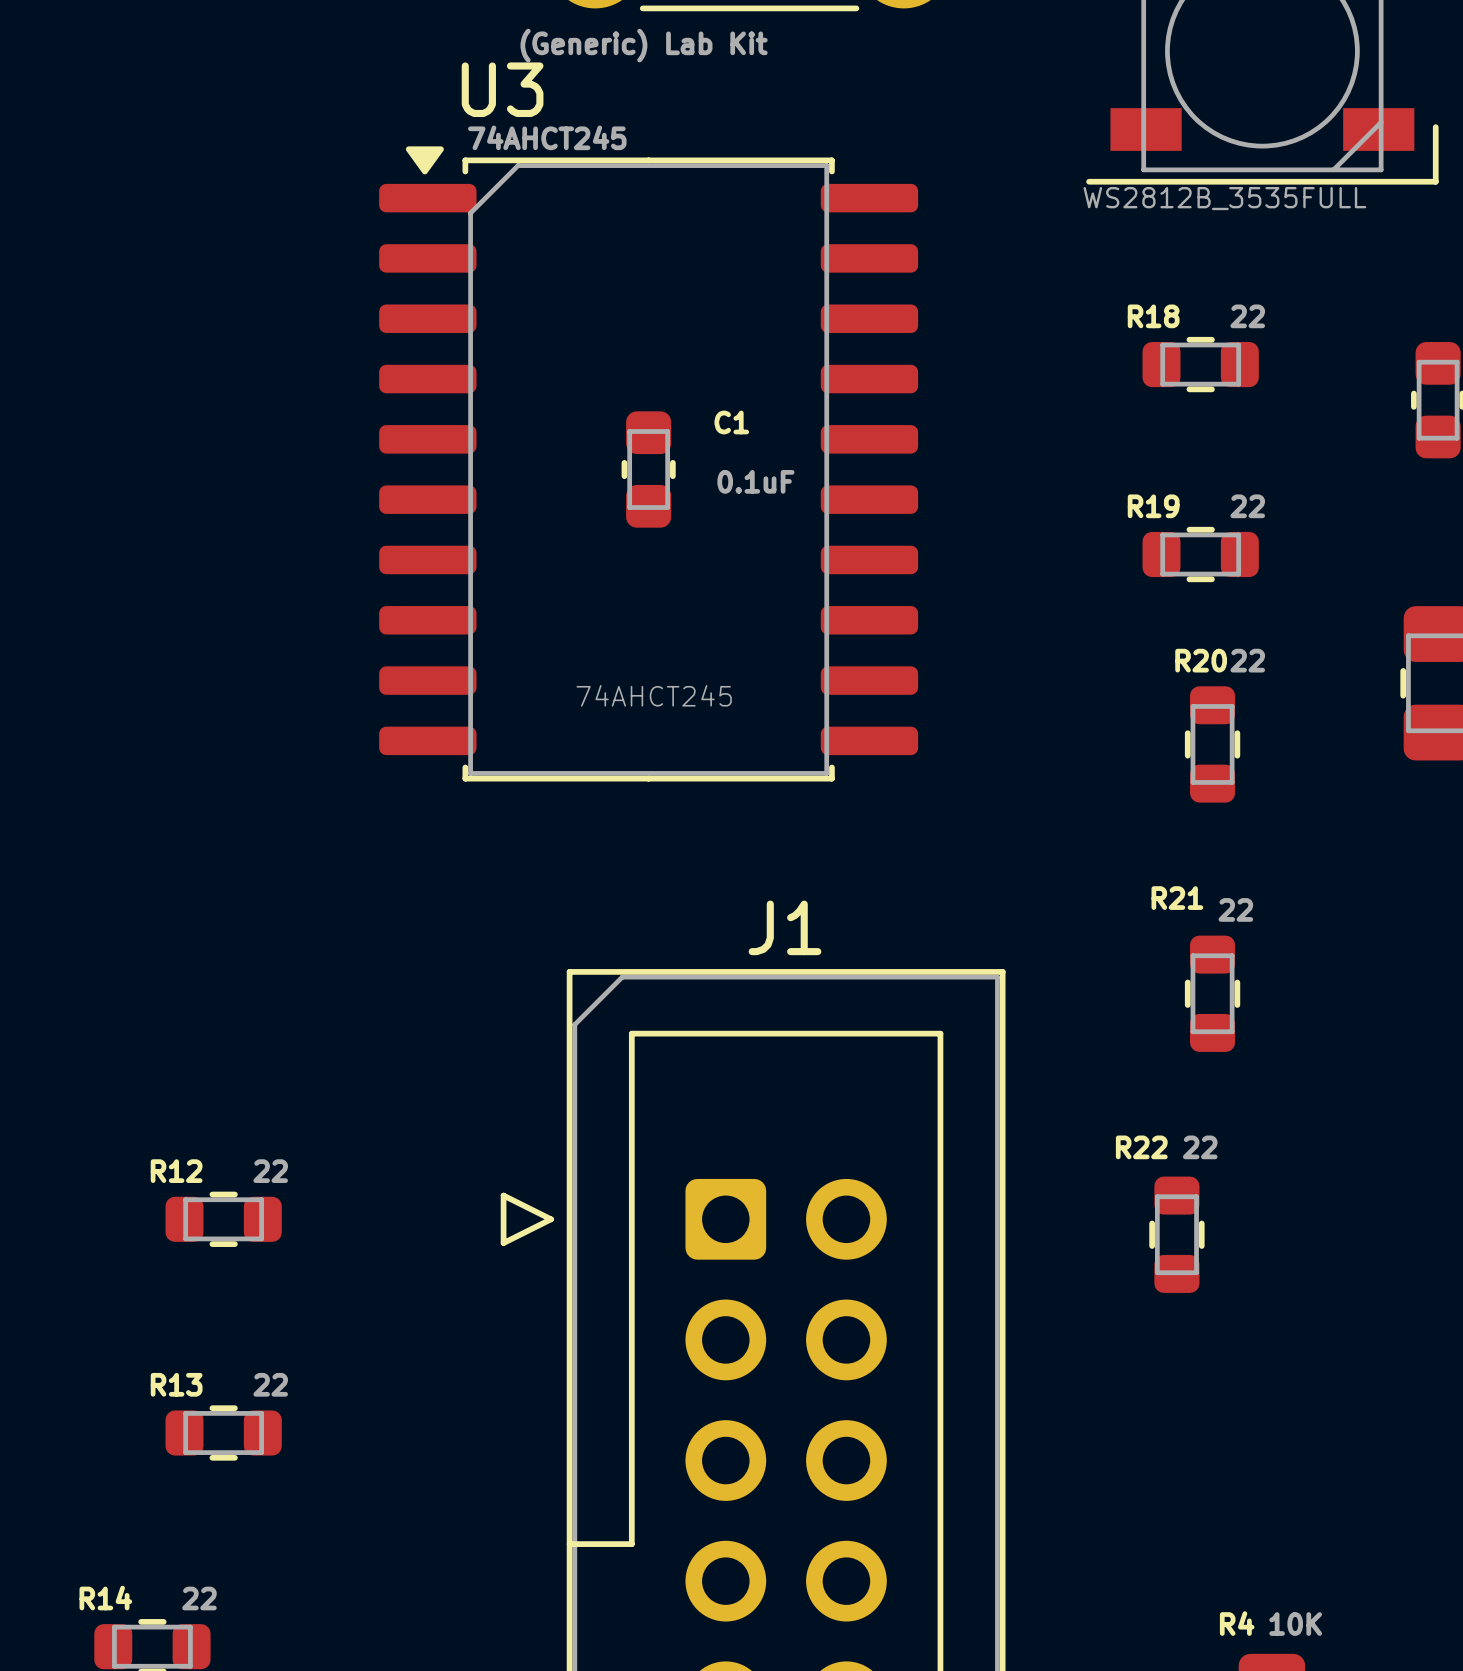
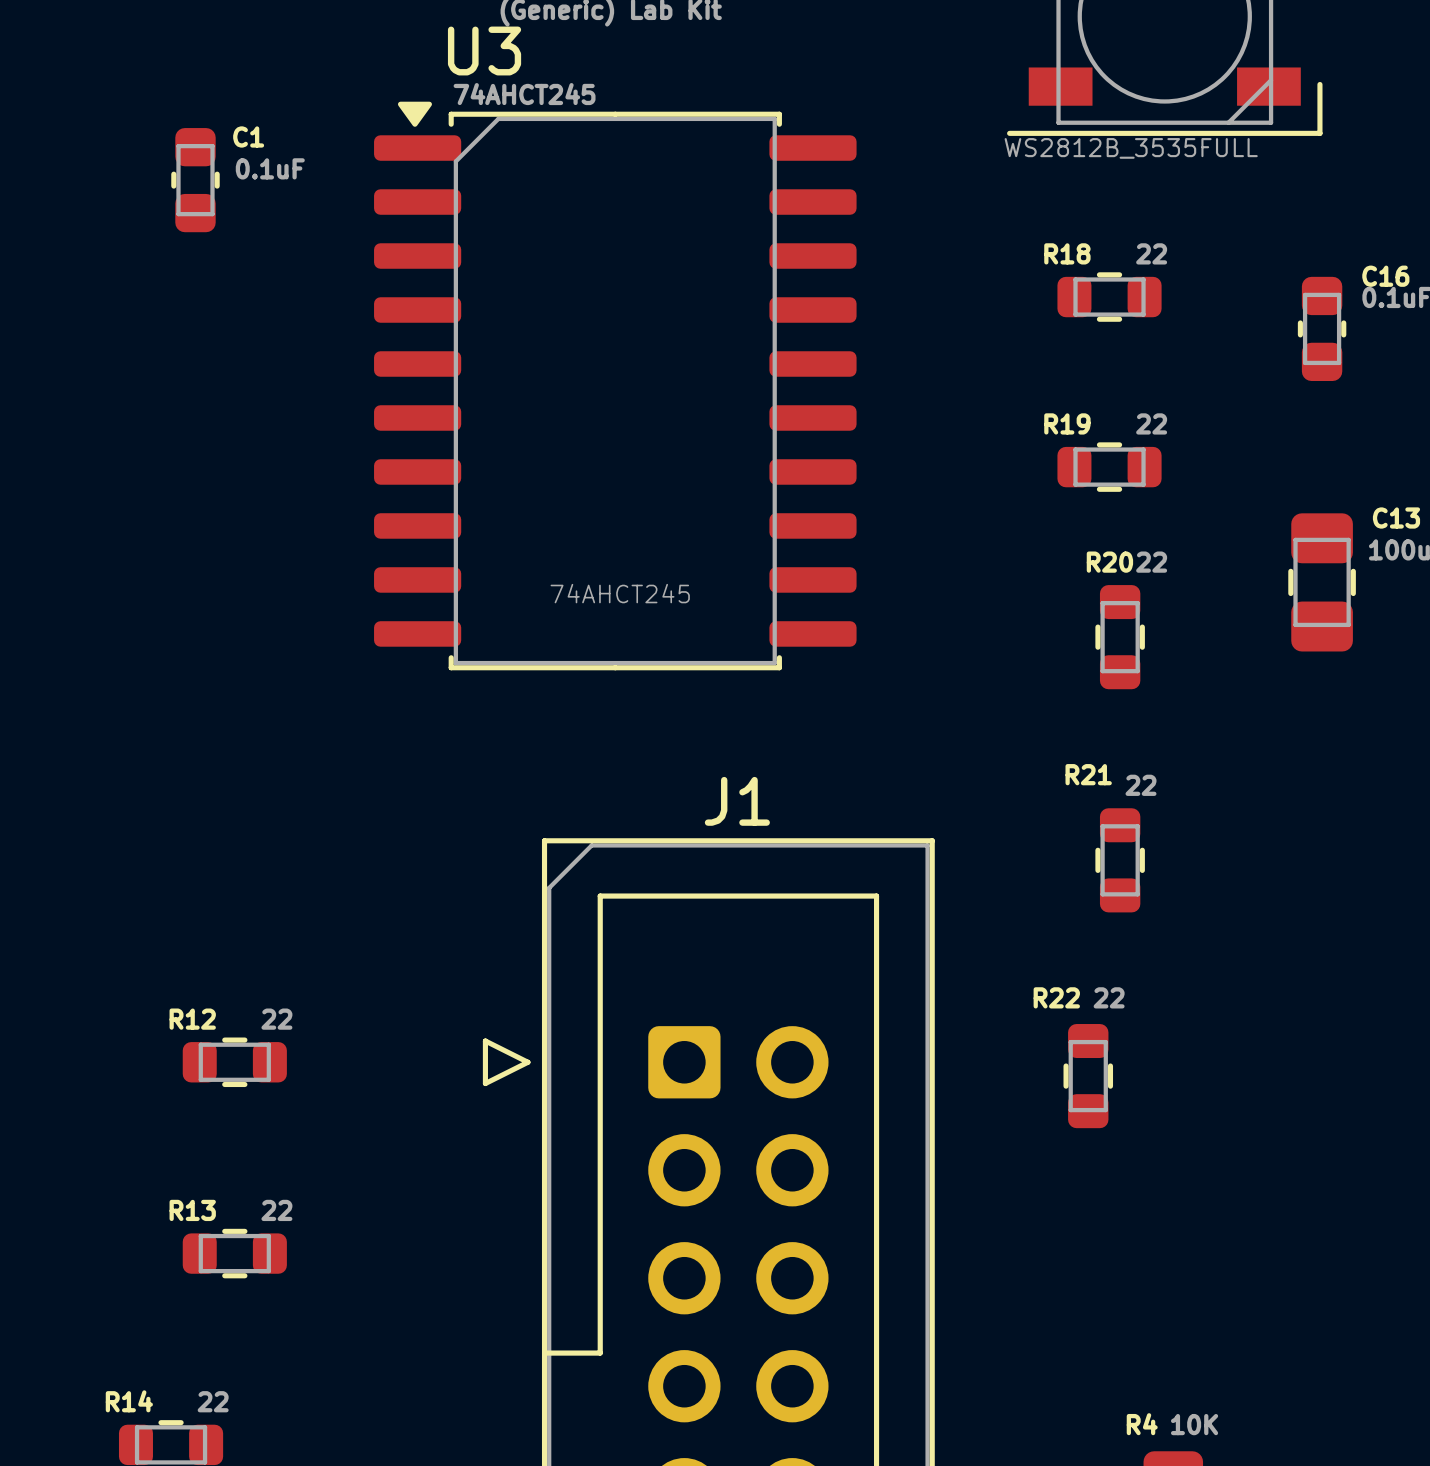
C1 name position: C1 (731, 422) -> C1 (248, 136)
C1 position: (648, 469) -> (195, 180)
C1 value position: 0.1uF (755, 481) -> 0.1uF (270, 168)

